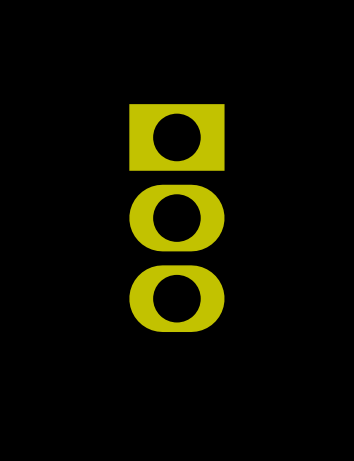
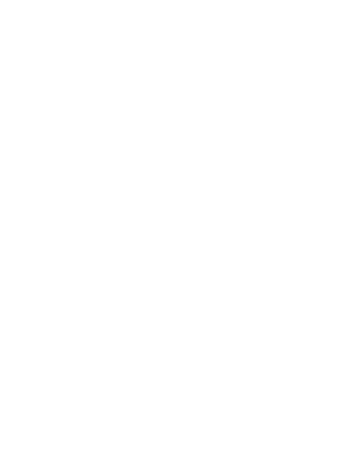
part: (176, 218) -> none

